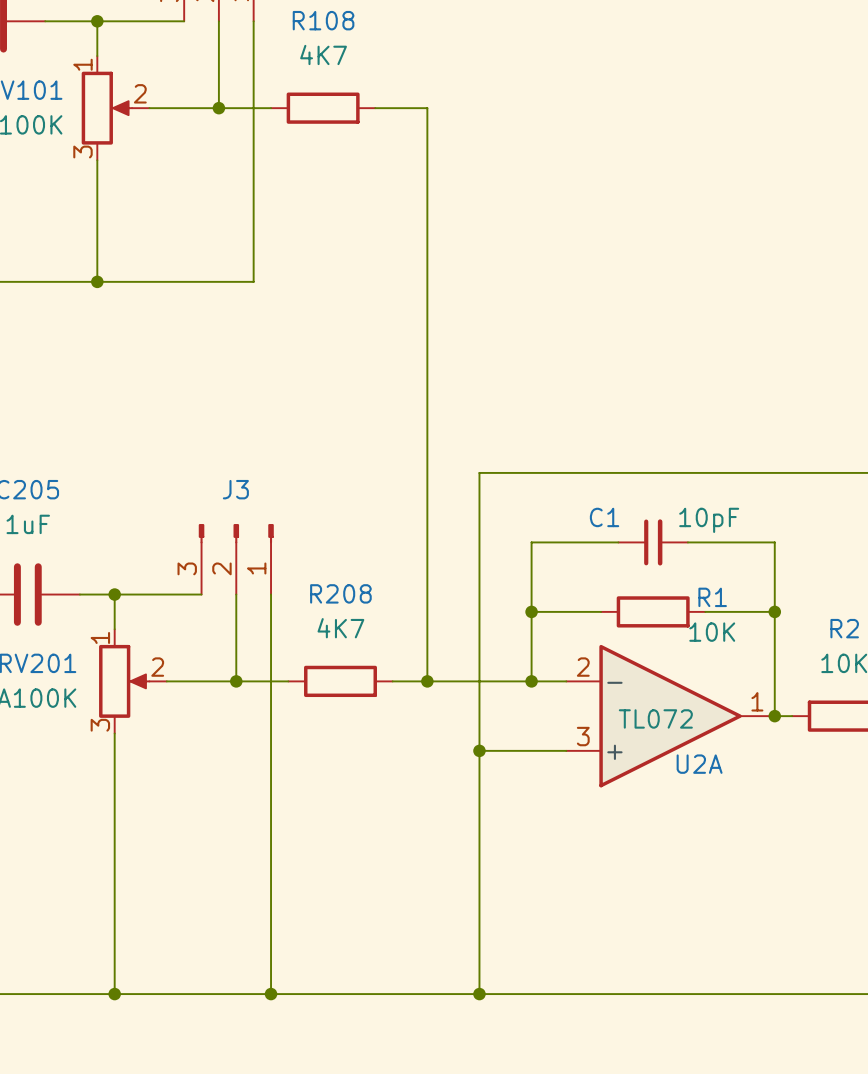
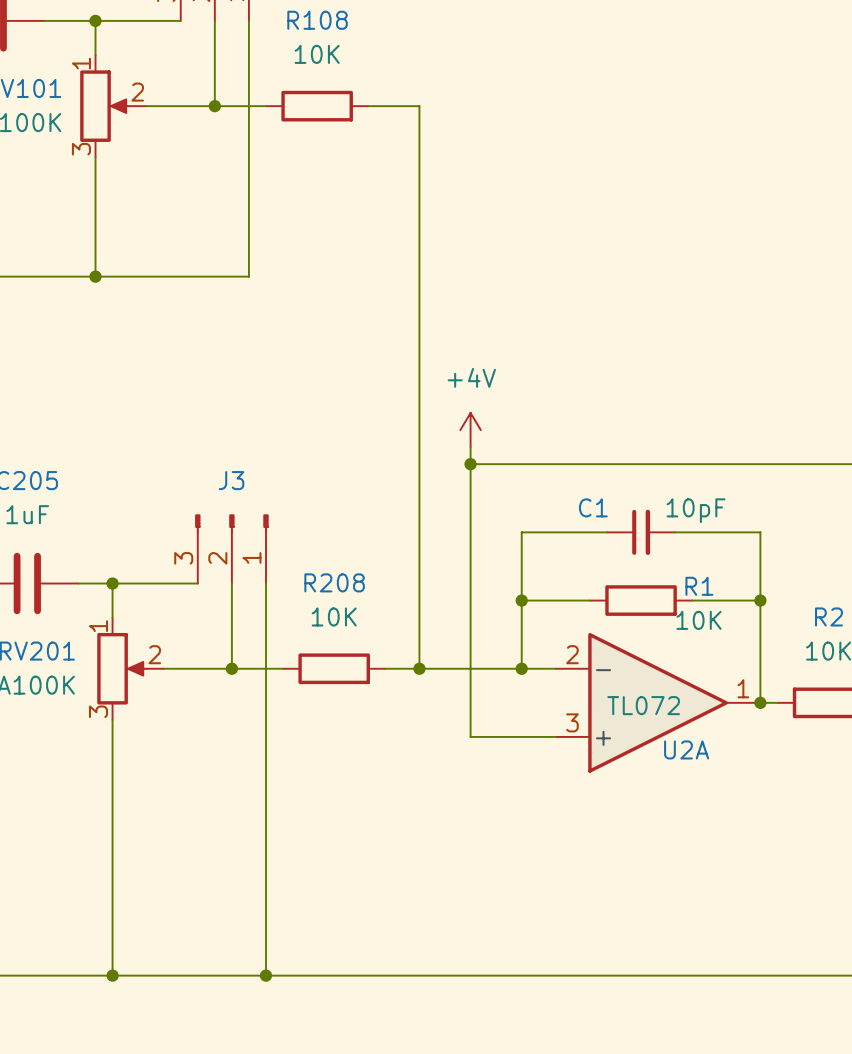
R108 value: 4K7 (323, 54) -> 10K (317, 54)
power symbol: none -> +4V (470, 430)
wire: none -> (470, 447) (470, 464)
junction: none -> (470, 464)
R208 value: 4K7 (340, 628) -> 10K (334, 616)
wire: (479, 750) (479, 994) -> none
junction: (479, 750) -> none
junction: (479, 994) -> none

